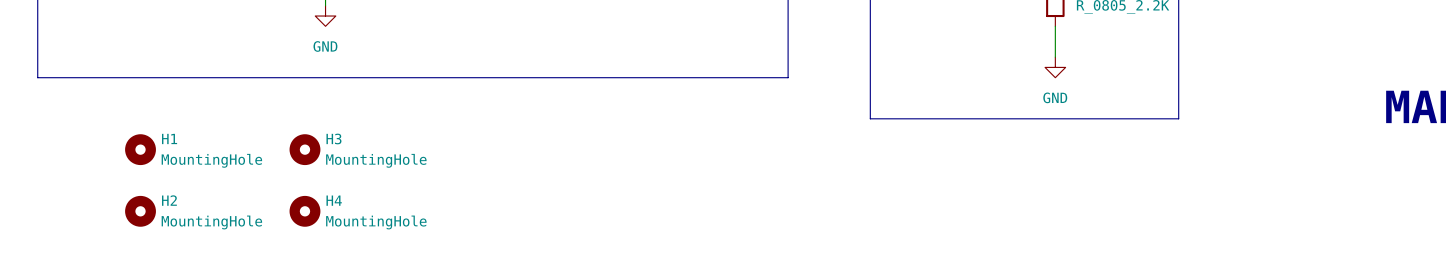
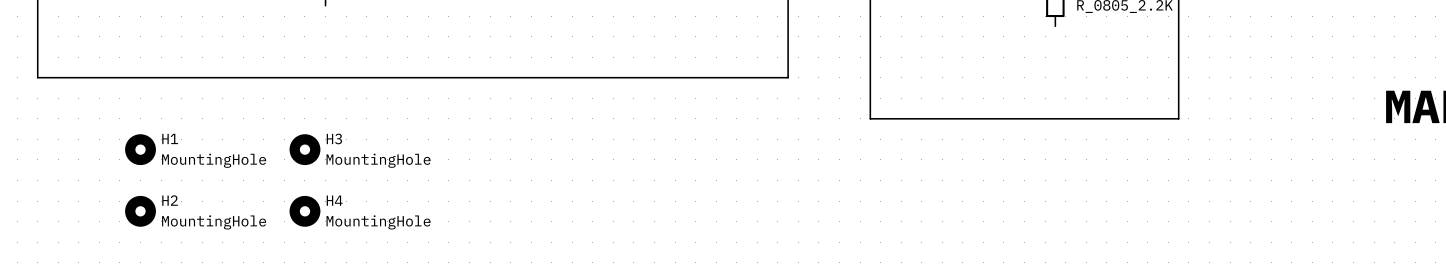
power symbol: GND (325, 16) -> none
wire: (1055, 26) (1055, 57) -> none
power symbol: GND (1055, 67) -> none

